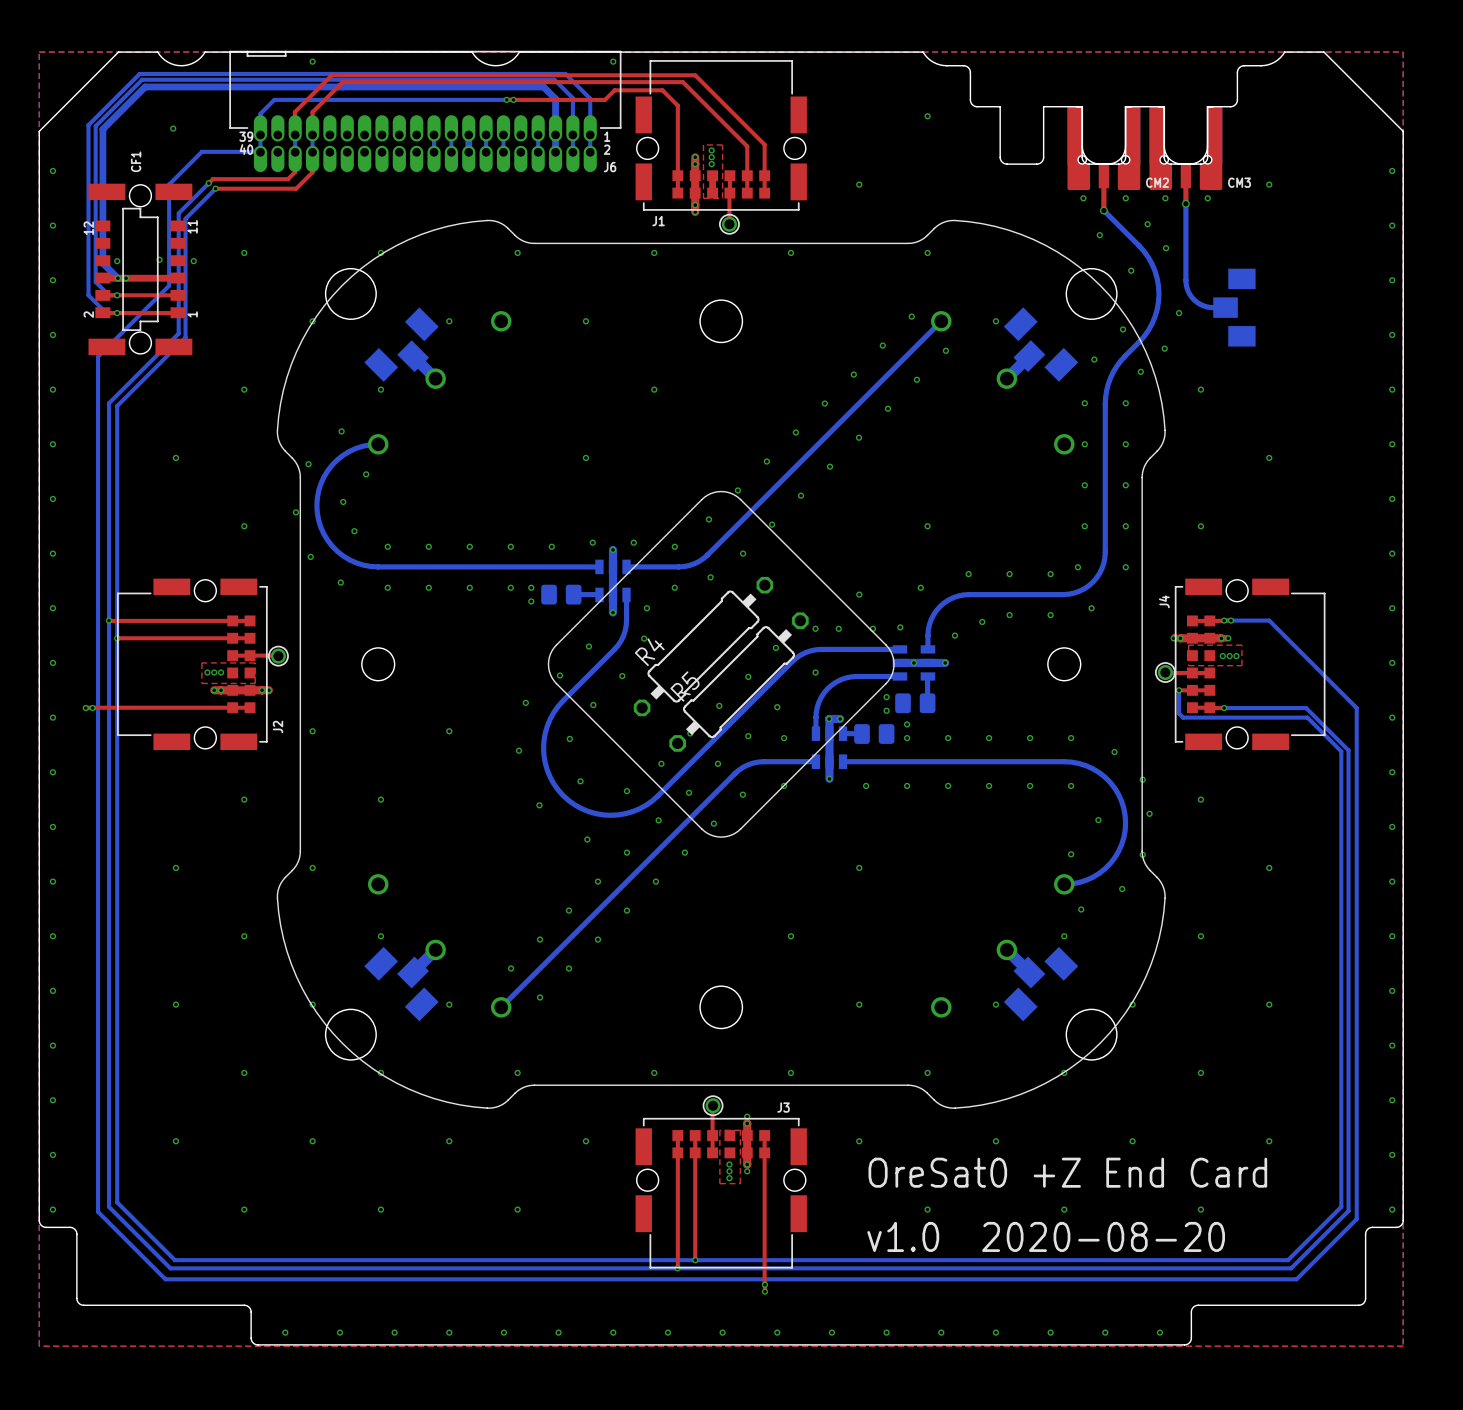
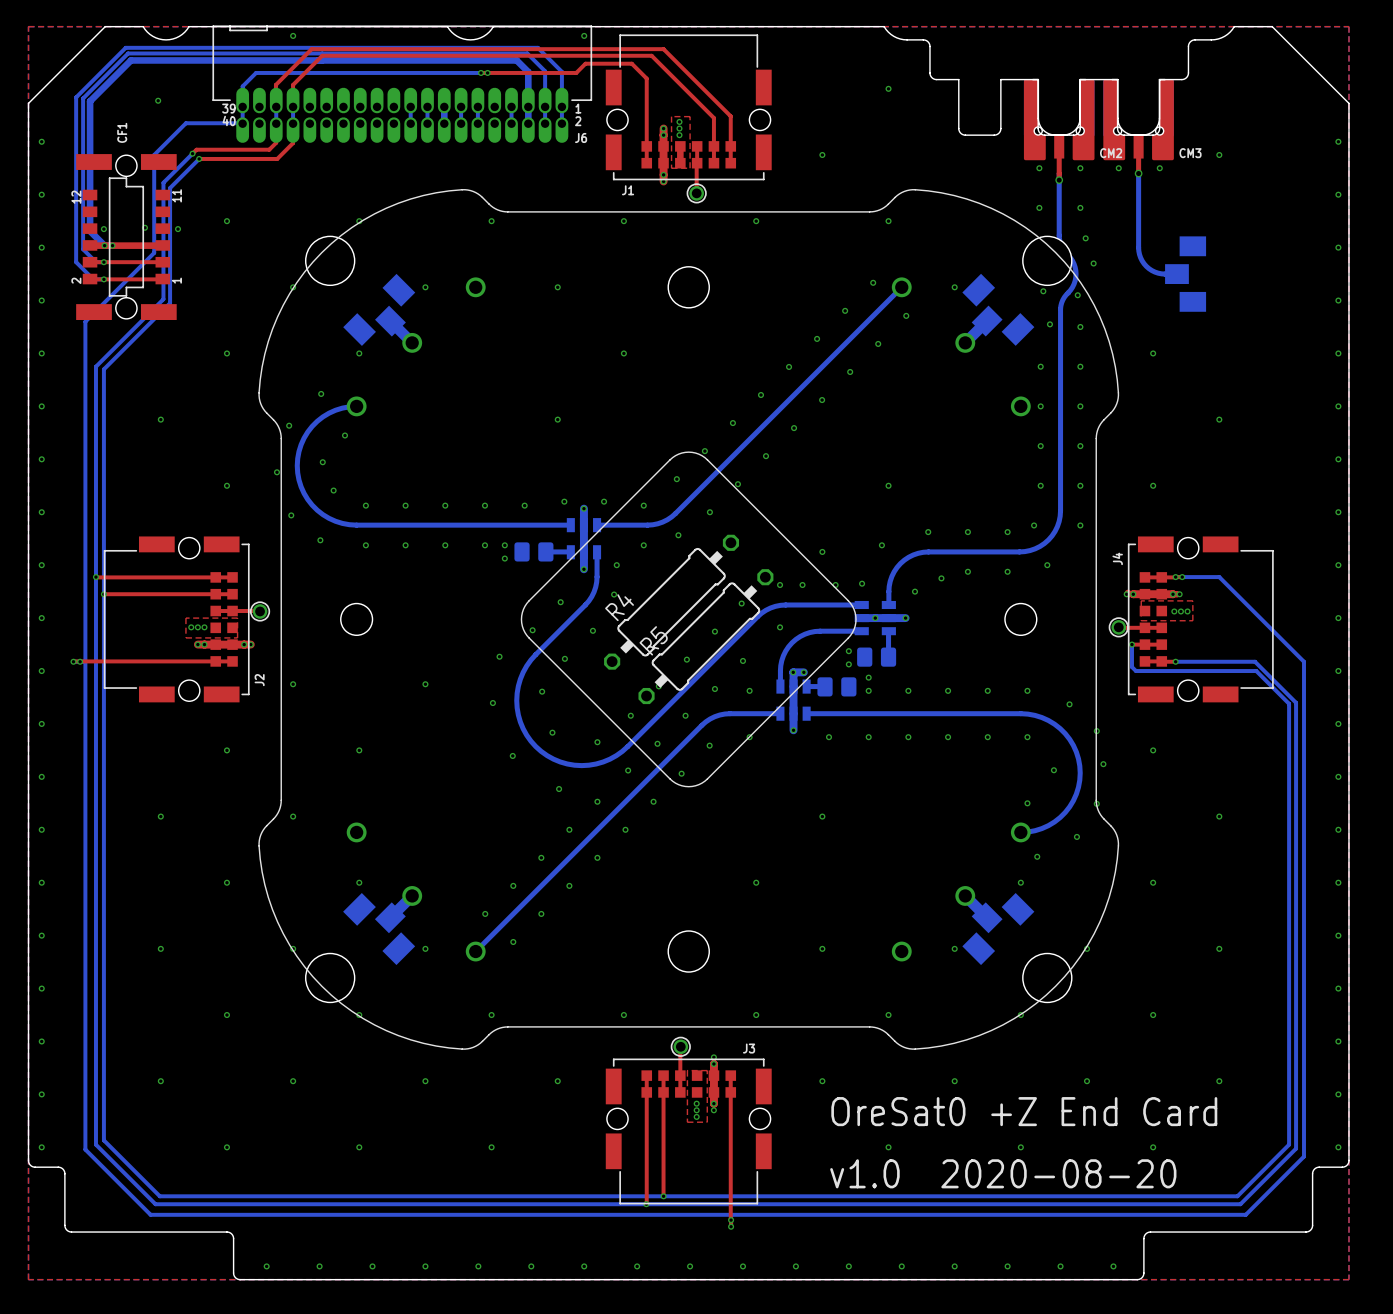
drawing shape: [39, 52, 1404, 1345] -> [28, 26, 1349, 1280]
bottom track: none -> (1059, 173) (1059, 240) (1063, 250) (1072, 260) (1075, 270) (1074, 284) (1068, 292)
bottom track: (1103, 210) (1148, 257) (1157, 278) (1158, 293) (1157, 309) (1152, 323) (1144, 336) (1120, 360) (1113, 372) (1108, 384) (1105, 404) -> (1068, 292) (1062, 300) (1060, 308) (1060, 367)
via: (1147, 224) -> none
via: (1099, 235) -> none
via: none -> (1039, 207)
via: none -> (1080, 207)
via: (1166, 248) -> none
via: none -> (1093, 263)
via: (1179, 313) -> none
via: none -> (1043, 291)
via: (1164, 348) -> none
via position: (1140, 371) -> (1080, 327)

